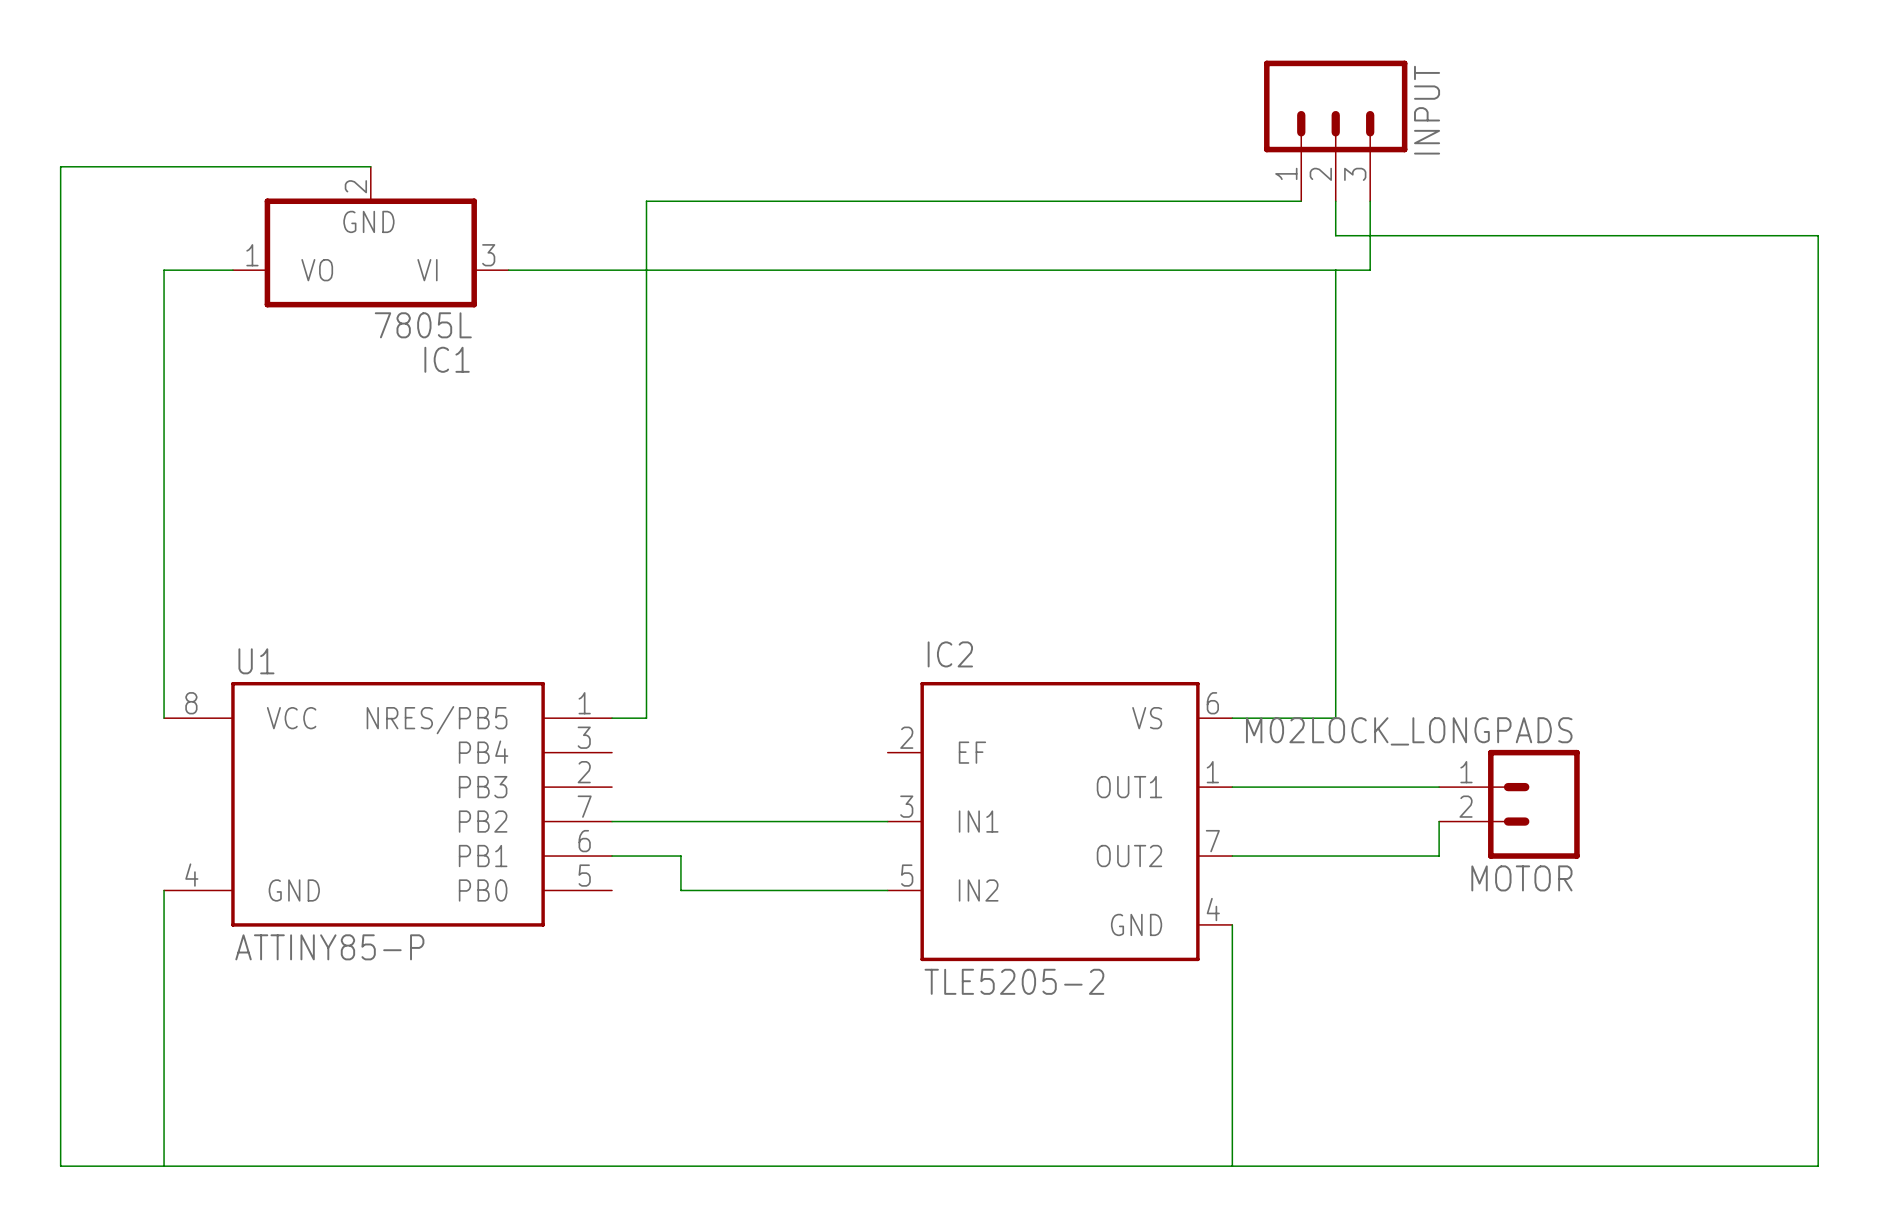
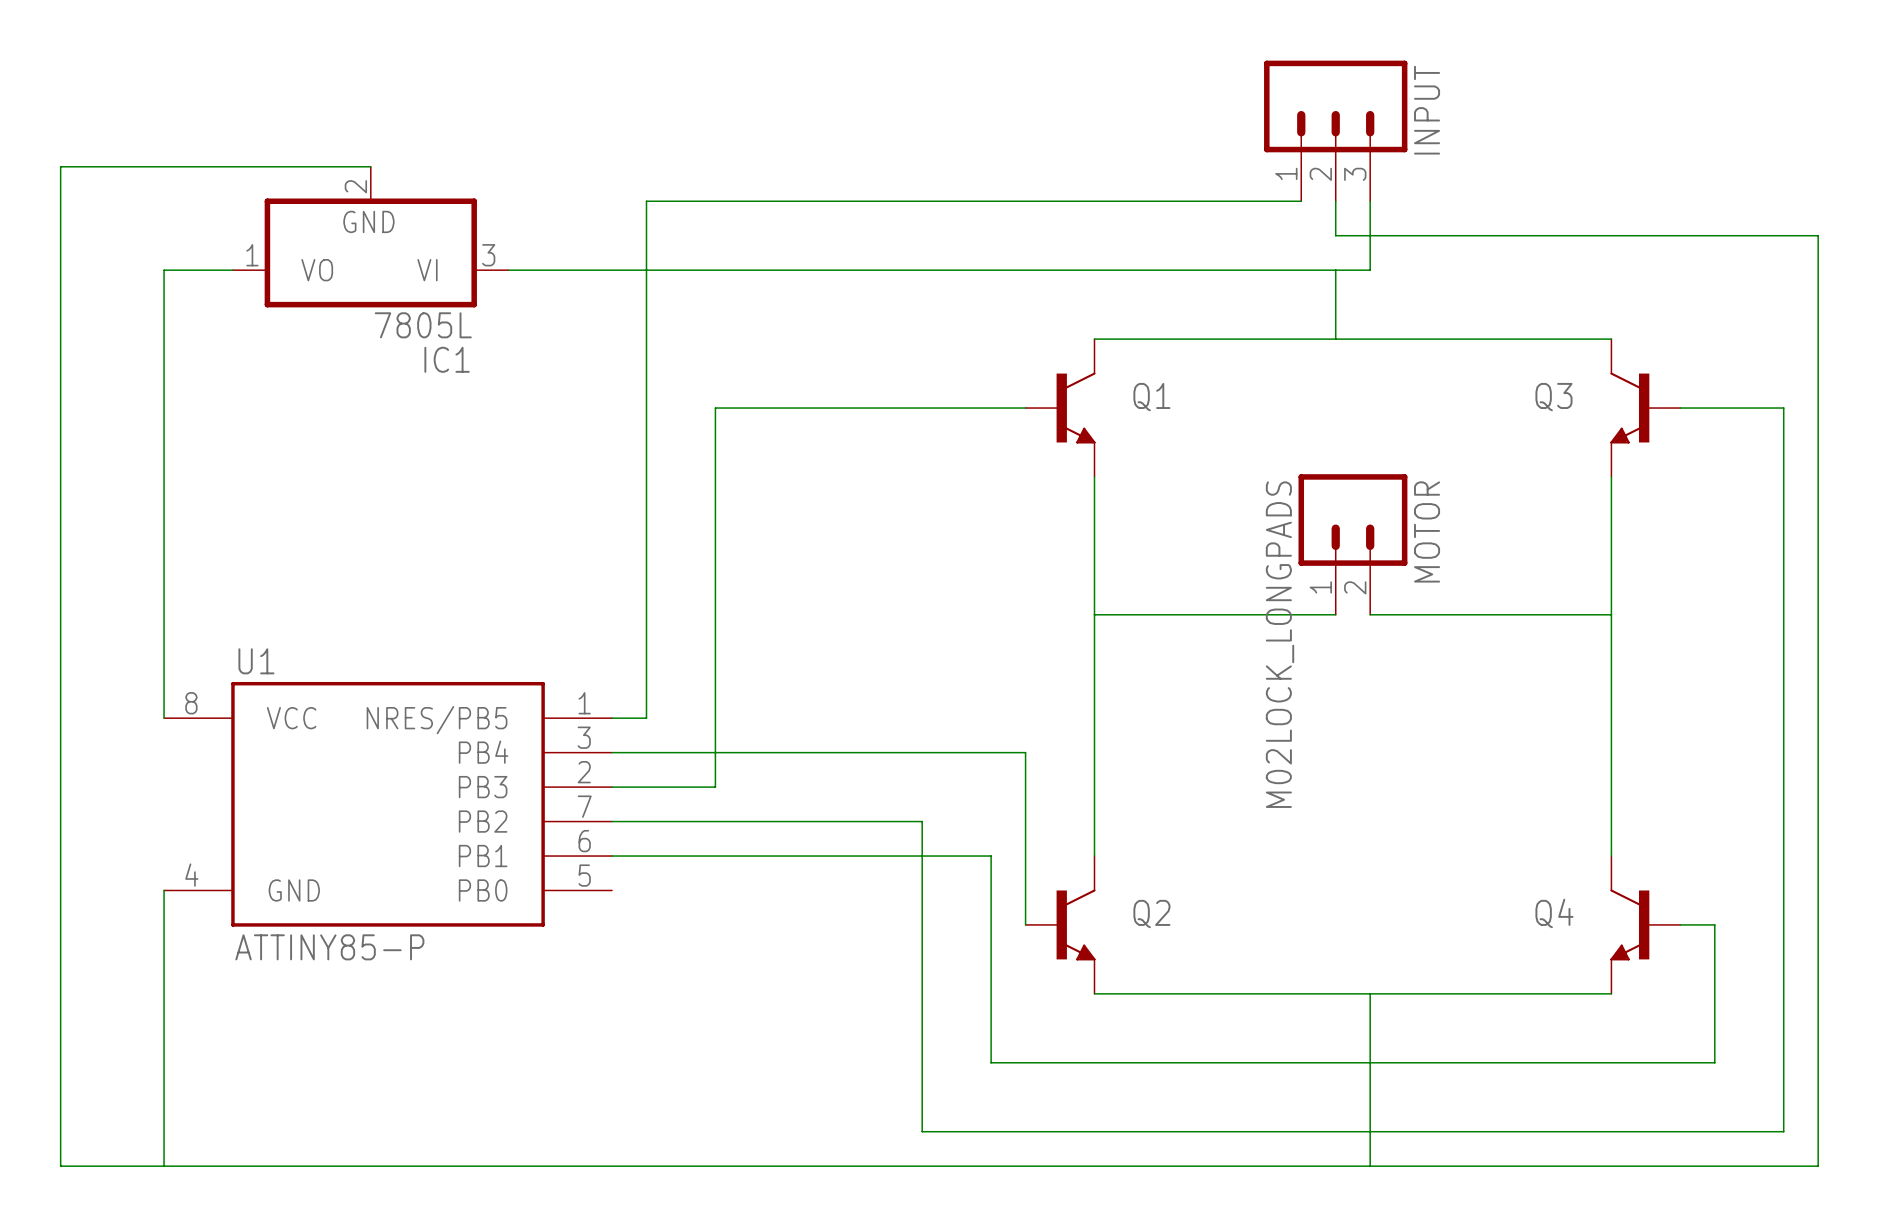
wire: none -> (1094, 339) (1611, 339)
wire: (1335, 339) (1335, 718) (1232, 718) -> none
wire: none -> (1025, 408) (715, 408) (715, 787) (612, 787)
Q1: none -> (1060, 408)
Q3: none -> (1645, 408)
wire: none -> (1680, 408) (1783, 408) (1783, 1131) (922, 1131) (922, 821) (887, 821)
wire: none -> (1094, 476) (1094, 856)
wire: none -> (1611, 476) (1611, 856)
wire: none -> (1094, 614) (1335, 614)
wire: none -> (1370, 614) (1611, 614)
wire: none -> (612, 752) (1025, 752) (1025, 924)
wire: (1232, 787) (1439, 787) -> none
MOTOR position: (1509, 804) -> (1352, 544)
MOTOR rotation: 0° (1533, 804) -> 90° counterclockwise (1352, 520)
IC2: TLE5205-2 (1060, 821) -> none
wire: (1439, 821) (1439, 856) (1232, 856) -> none
wire: (680, 856) (680, 890) (887, 890) -> (680, 856) (991, 856) (991, 1062) (1714, 1062) (1714, 924) (1680, 924)
Q2: none -> (1060, 924)
wire: (1232, 924) (1232, 1166) -> none
Q4: none -> (1645, 924)
wire: none -> (1094, 993) (1611, 993)
wire: none -> (1370, 993) (1370, 1166)

